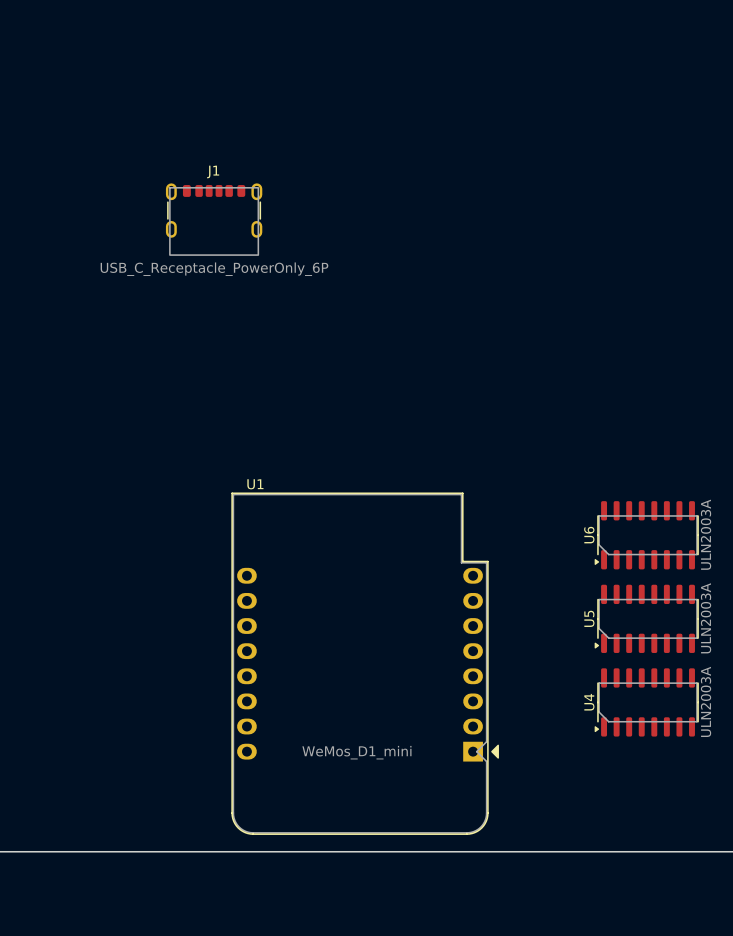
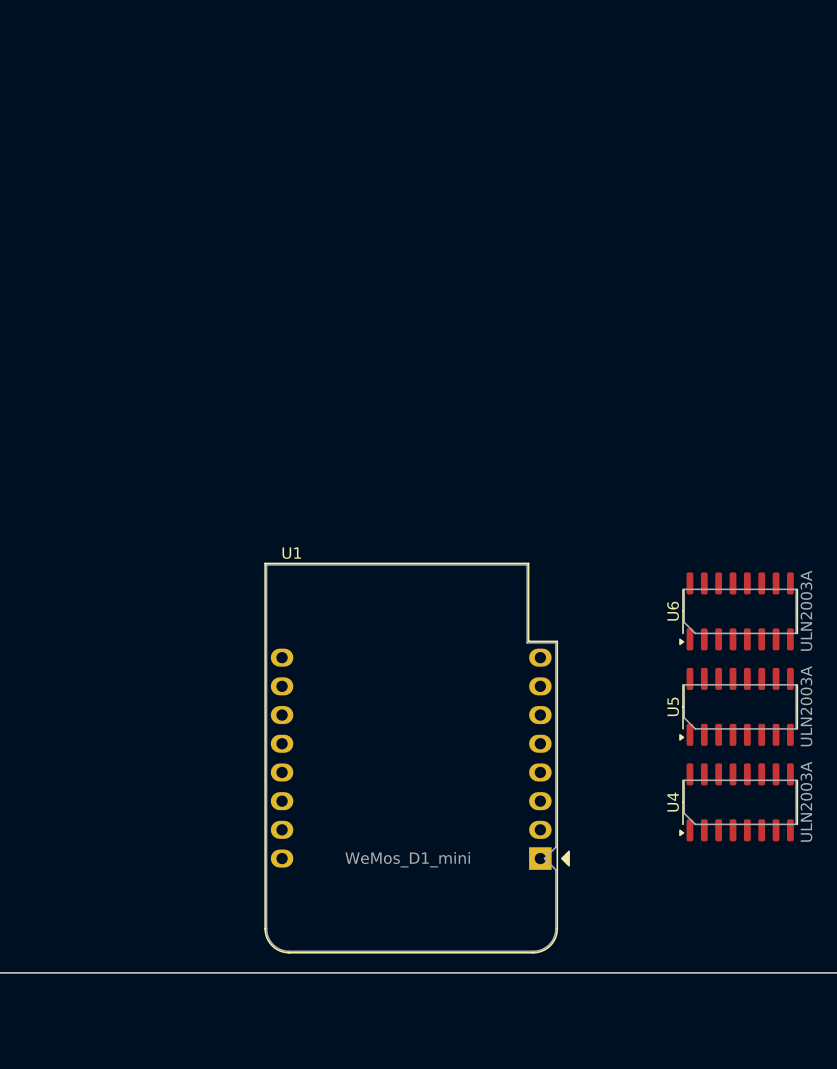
J1: USB_C_Receptacle_PowerOnly_6P (214, 219) -> none

